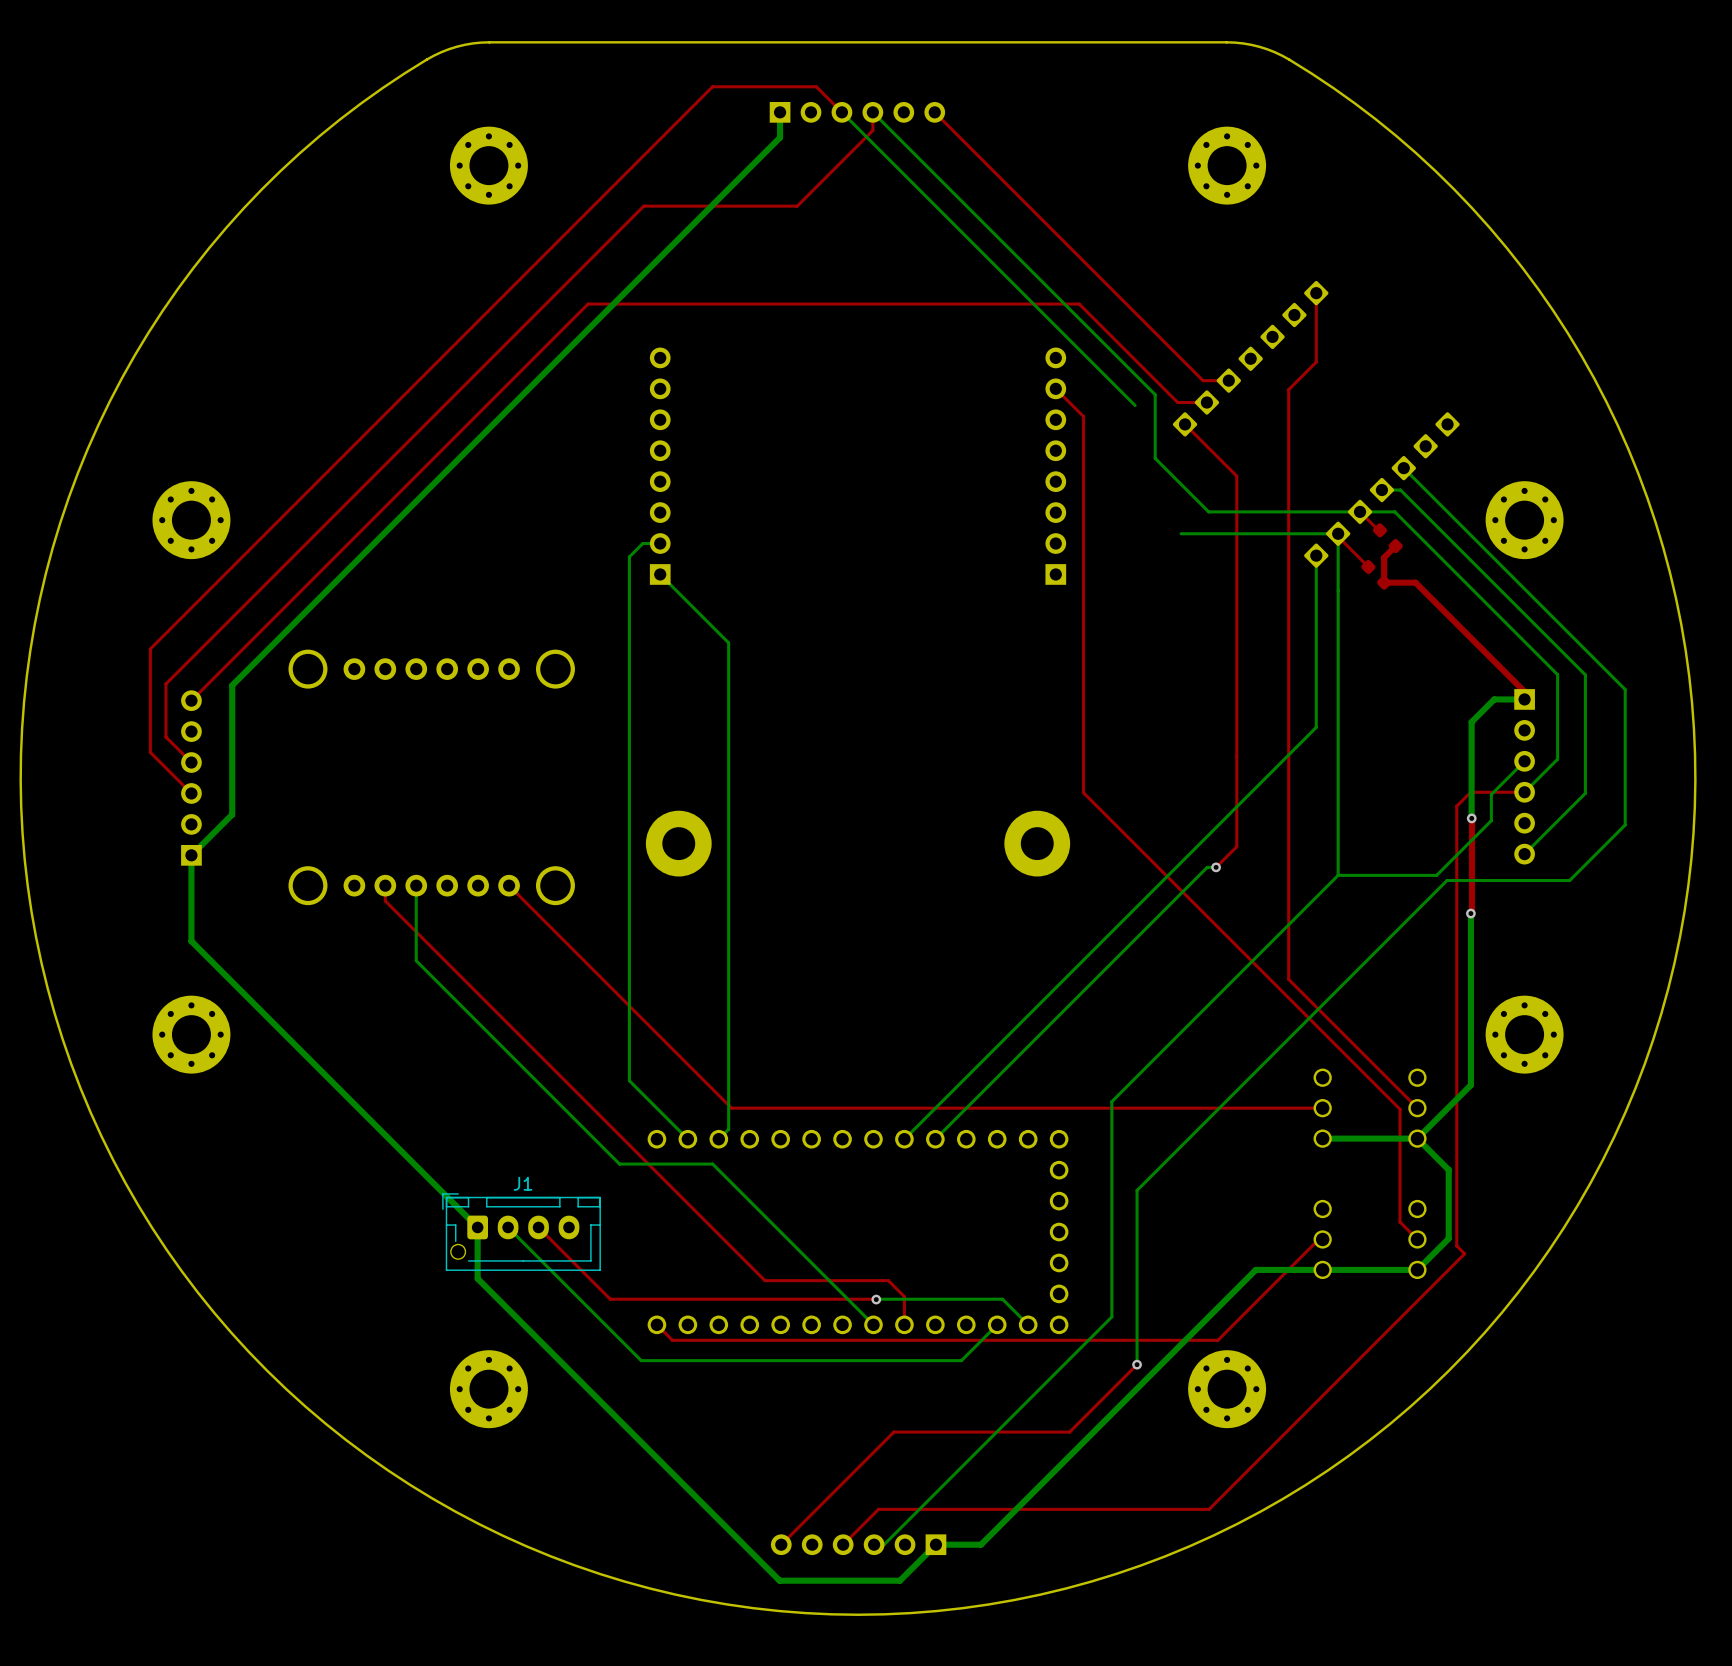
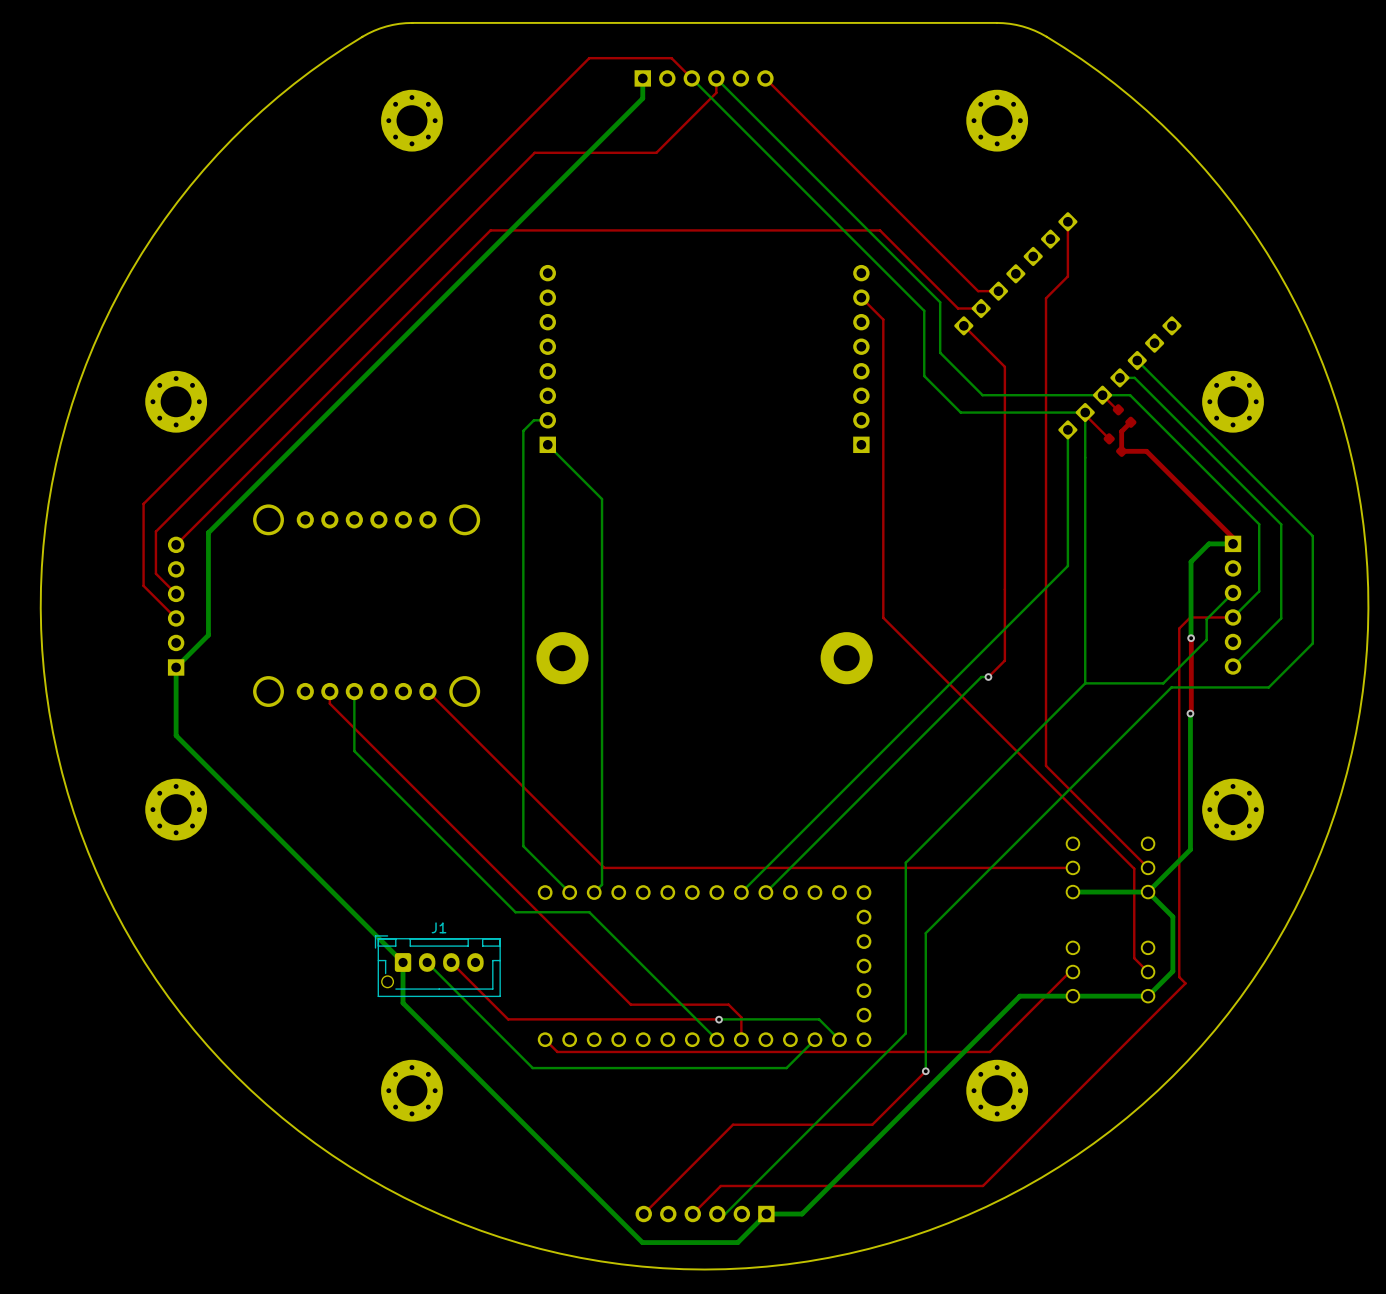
bottom track: none -> (924, 310) (924, 376) (960, 412)

